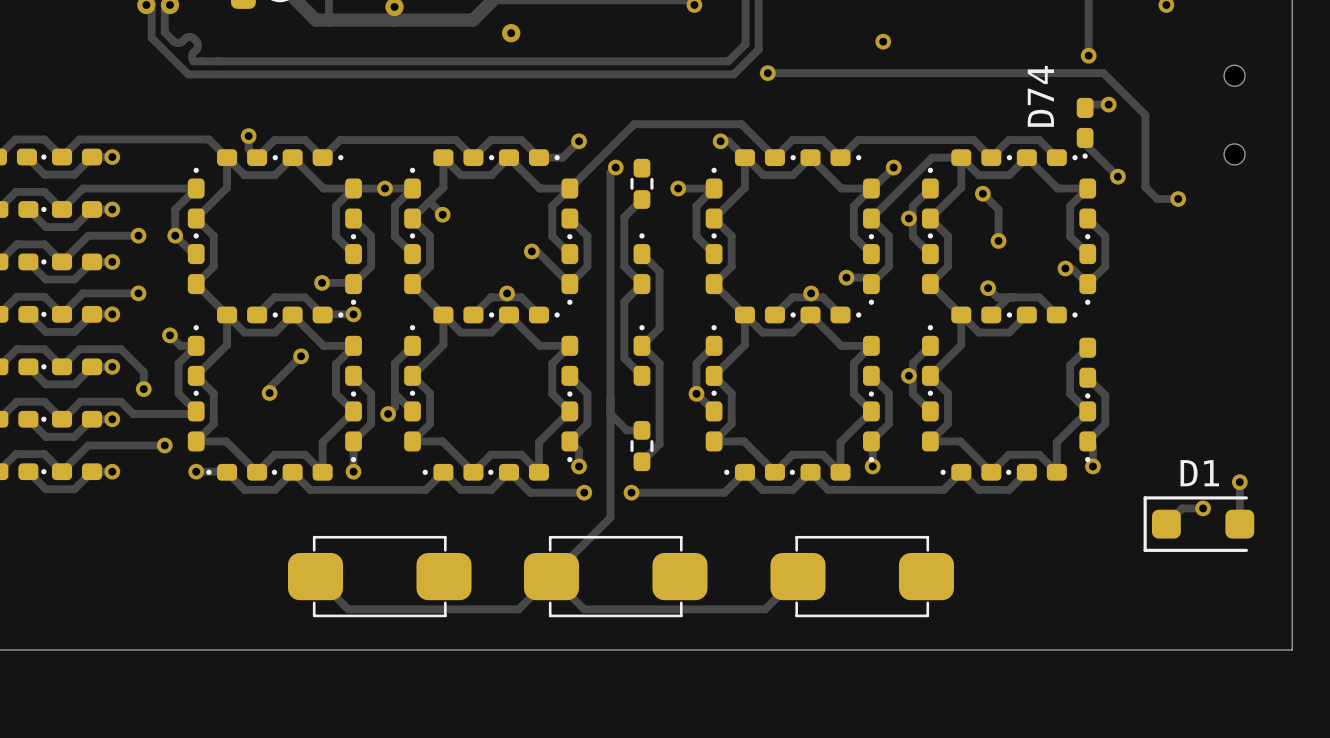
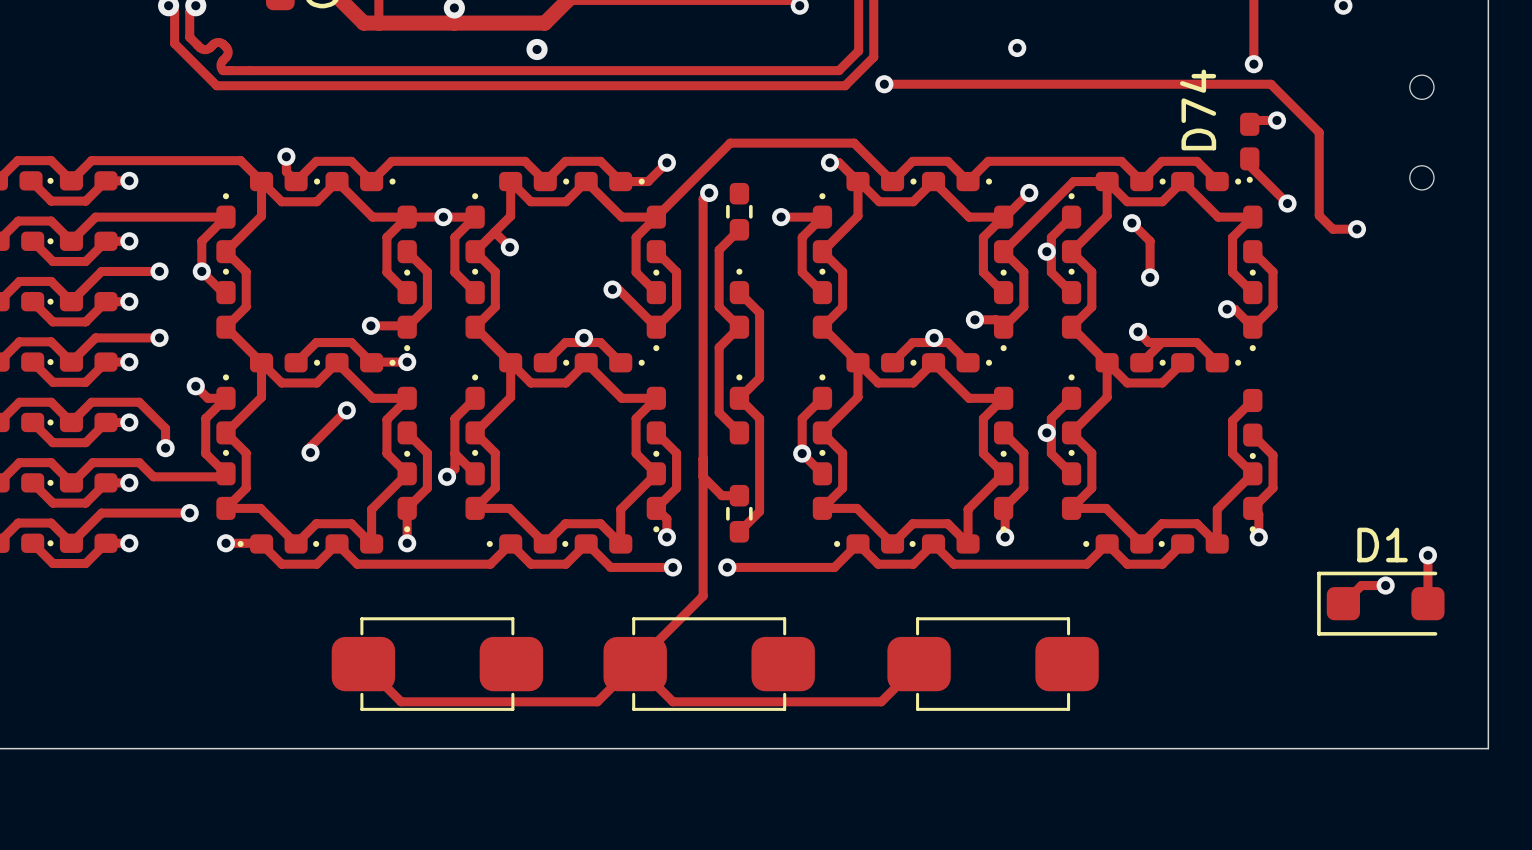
via position: (511, 33) -> (537, 49)

